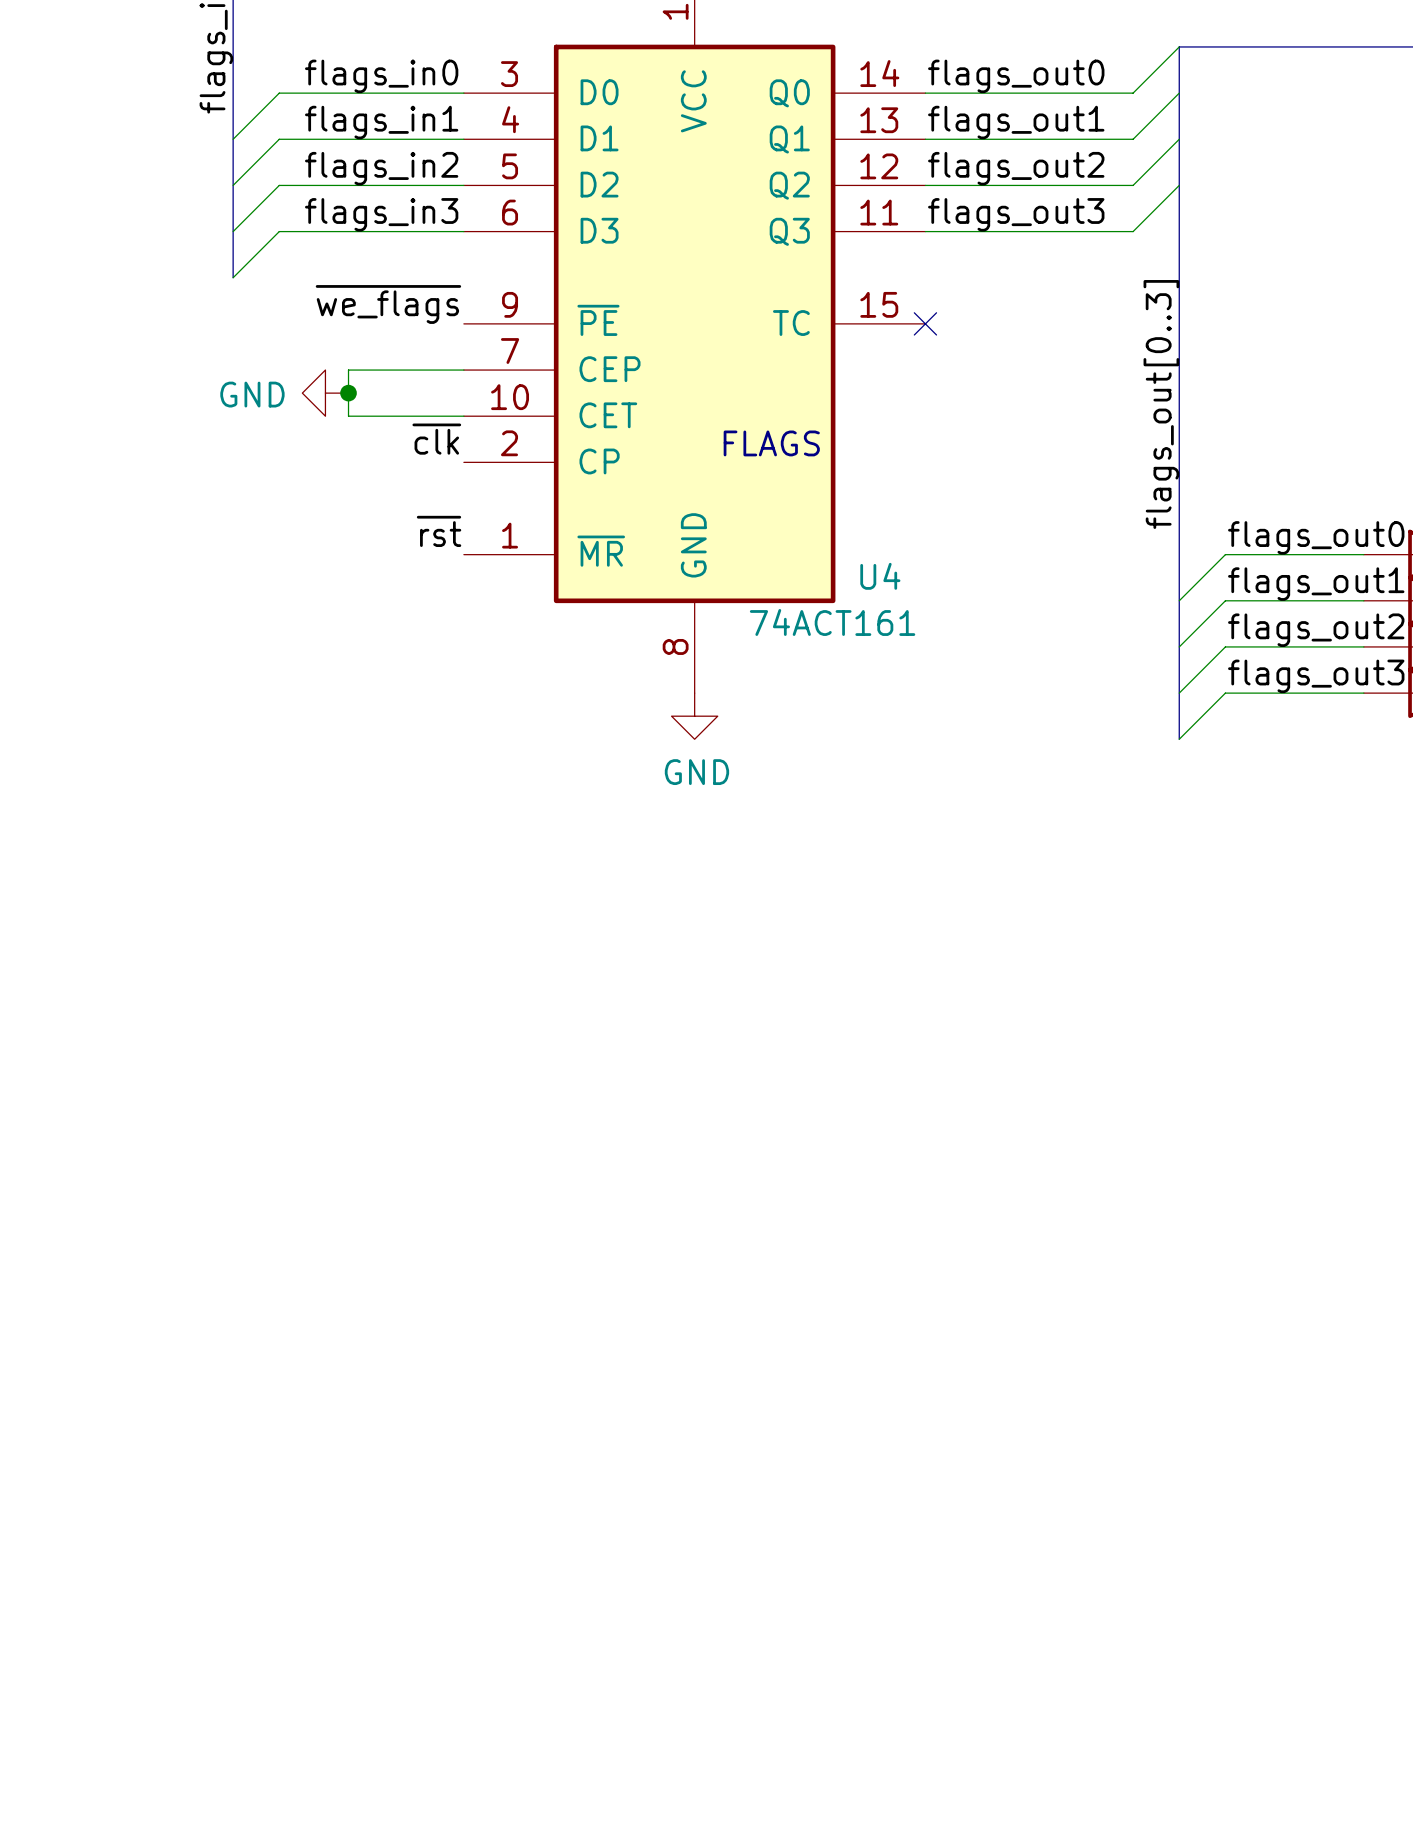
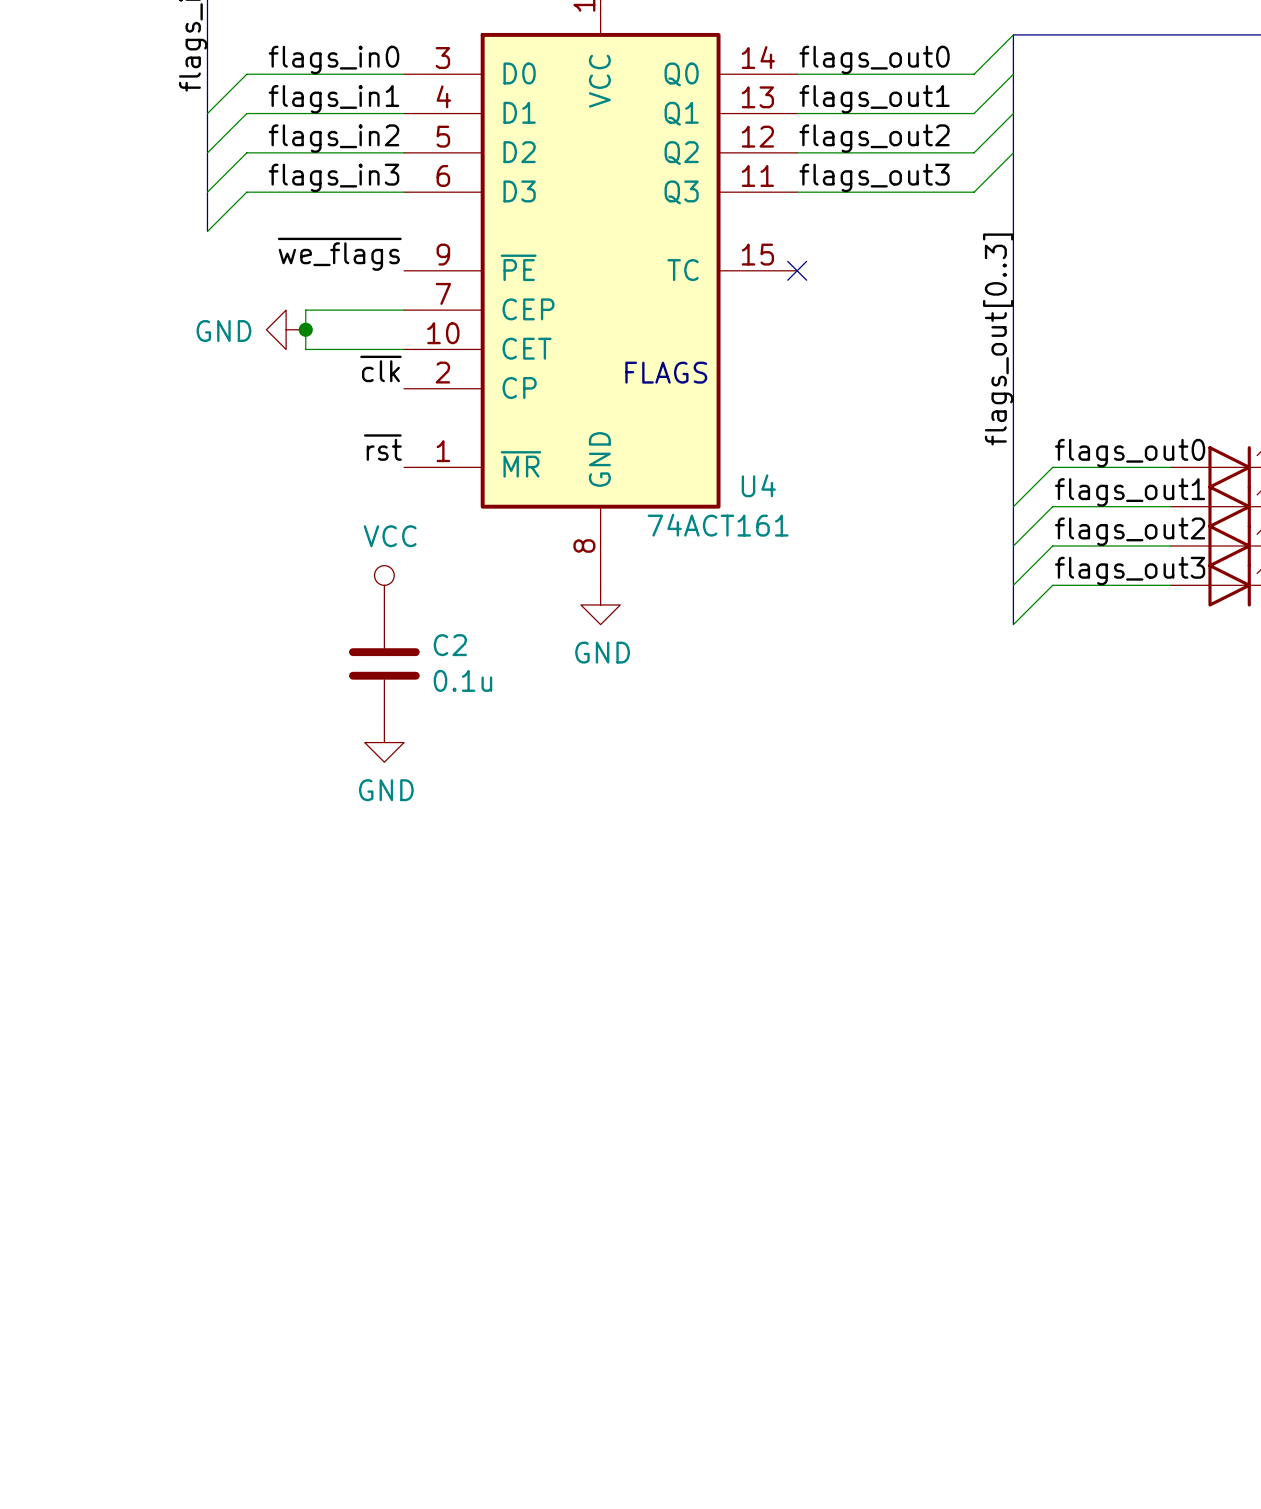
power symbol: none -> VCC (384, 585)
C2: none -> 0.1u (384, 663)
power symbol: none -> GND (384, 742)

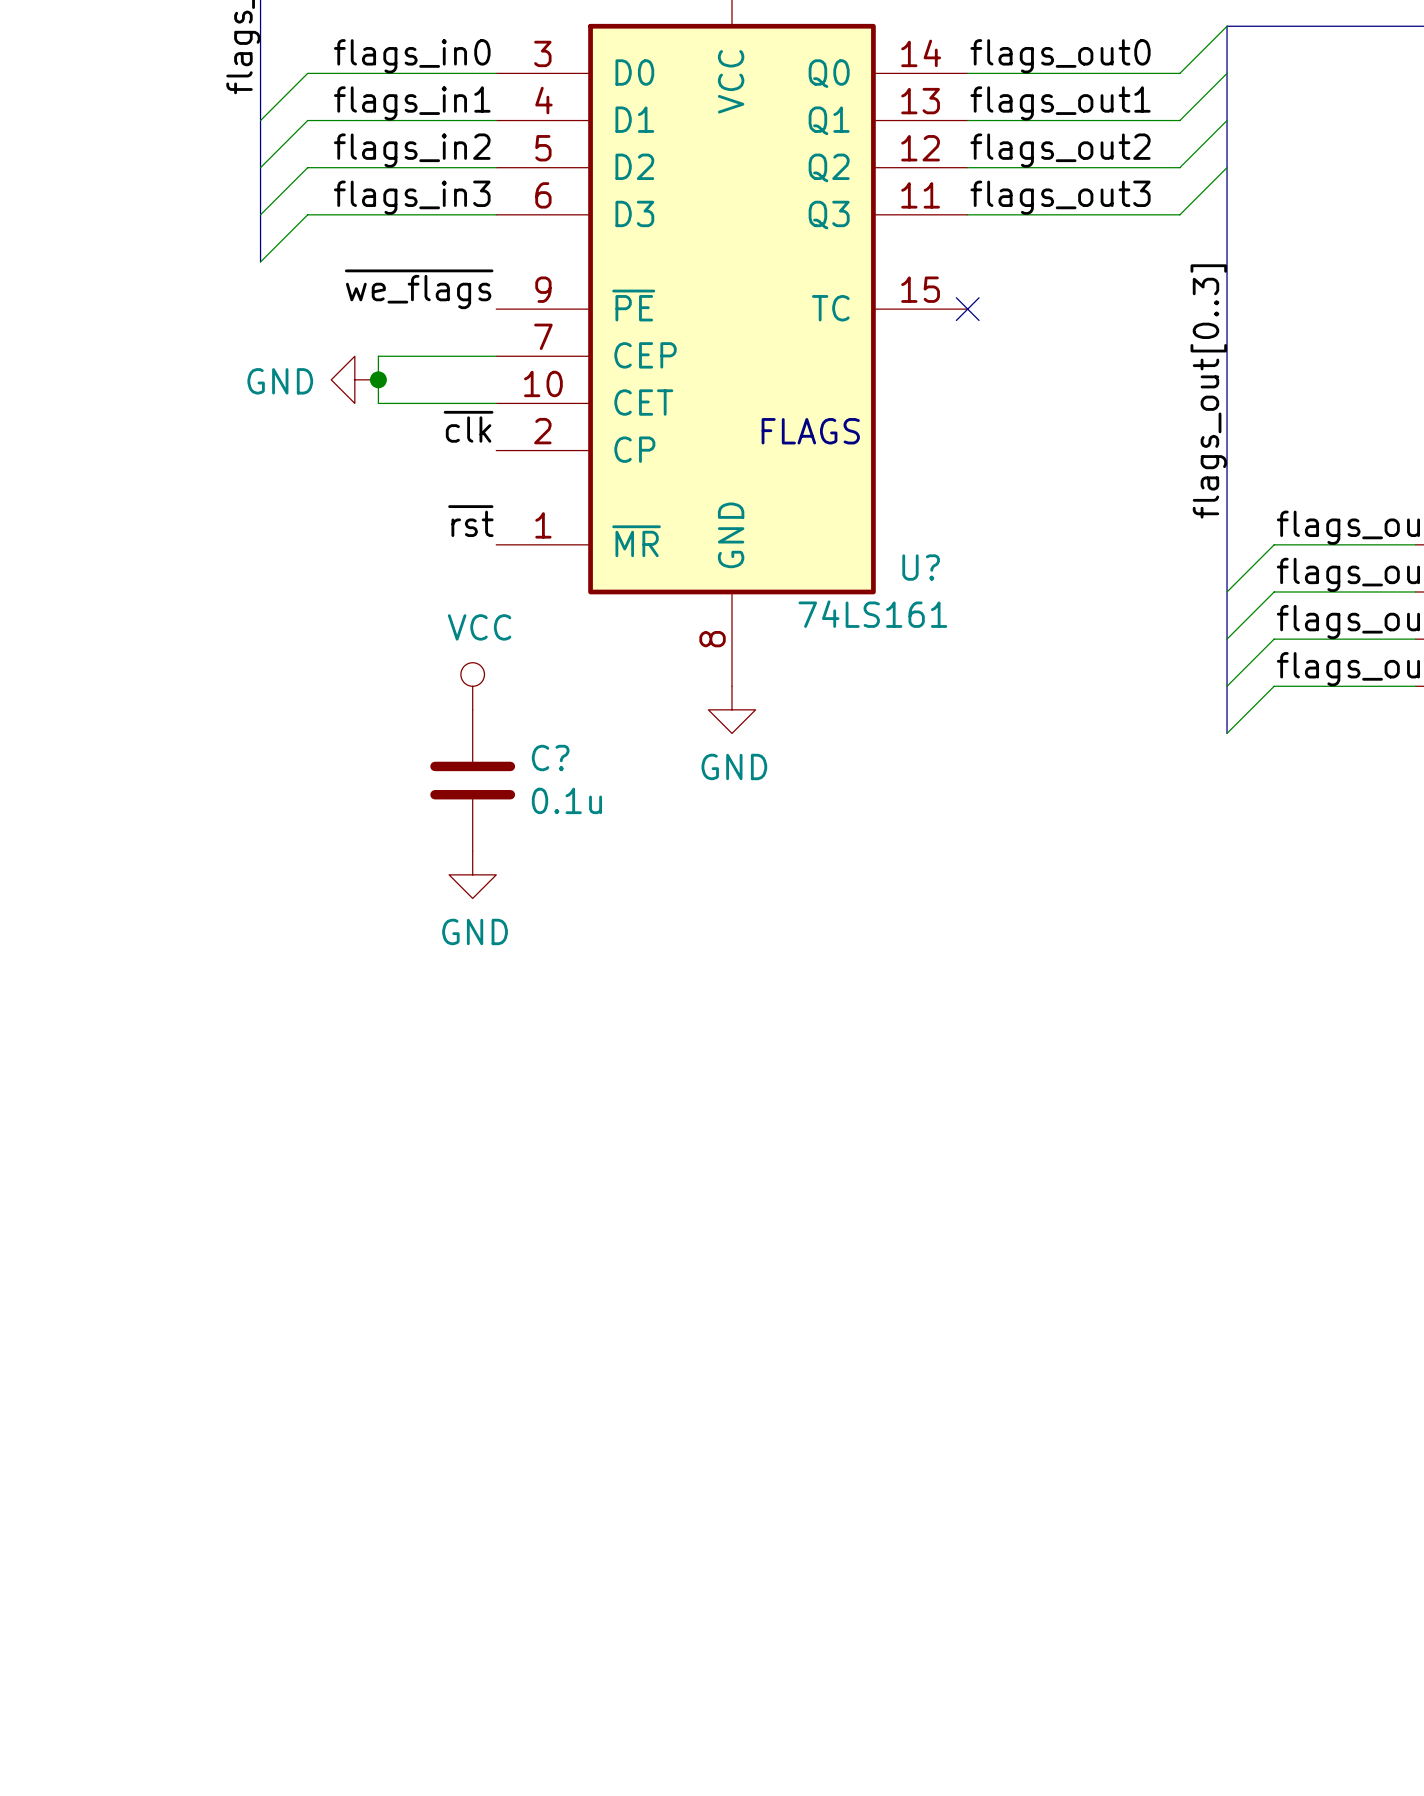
U4 name: U4 (758, 485) -> U? (921, 567)
U4 value: 74ACT161 (718, 525) -> 74LS161 (872, 614)
C2 name: C2 (450, 645) -> C? (550, 758)

